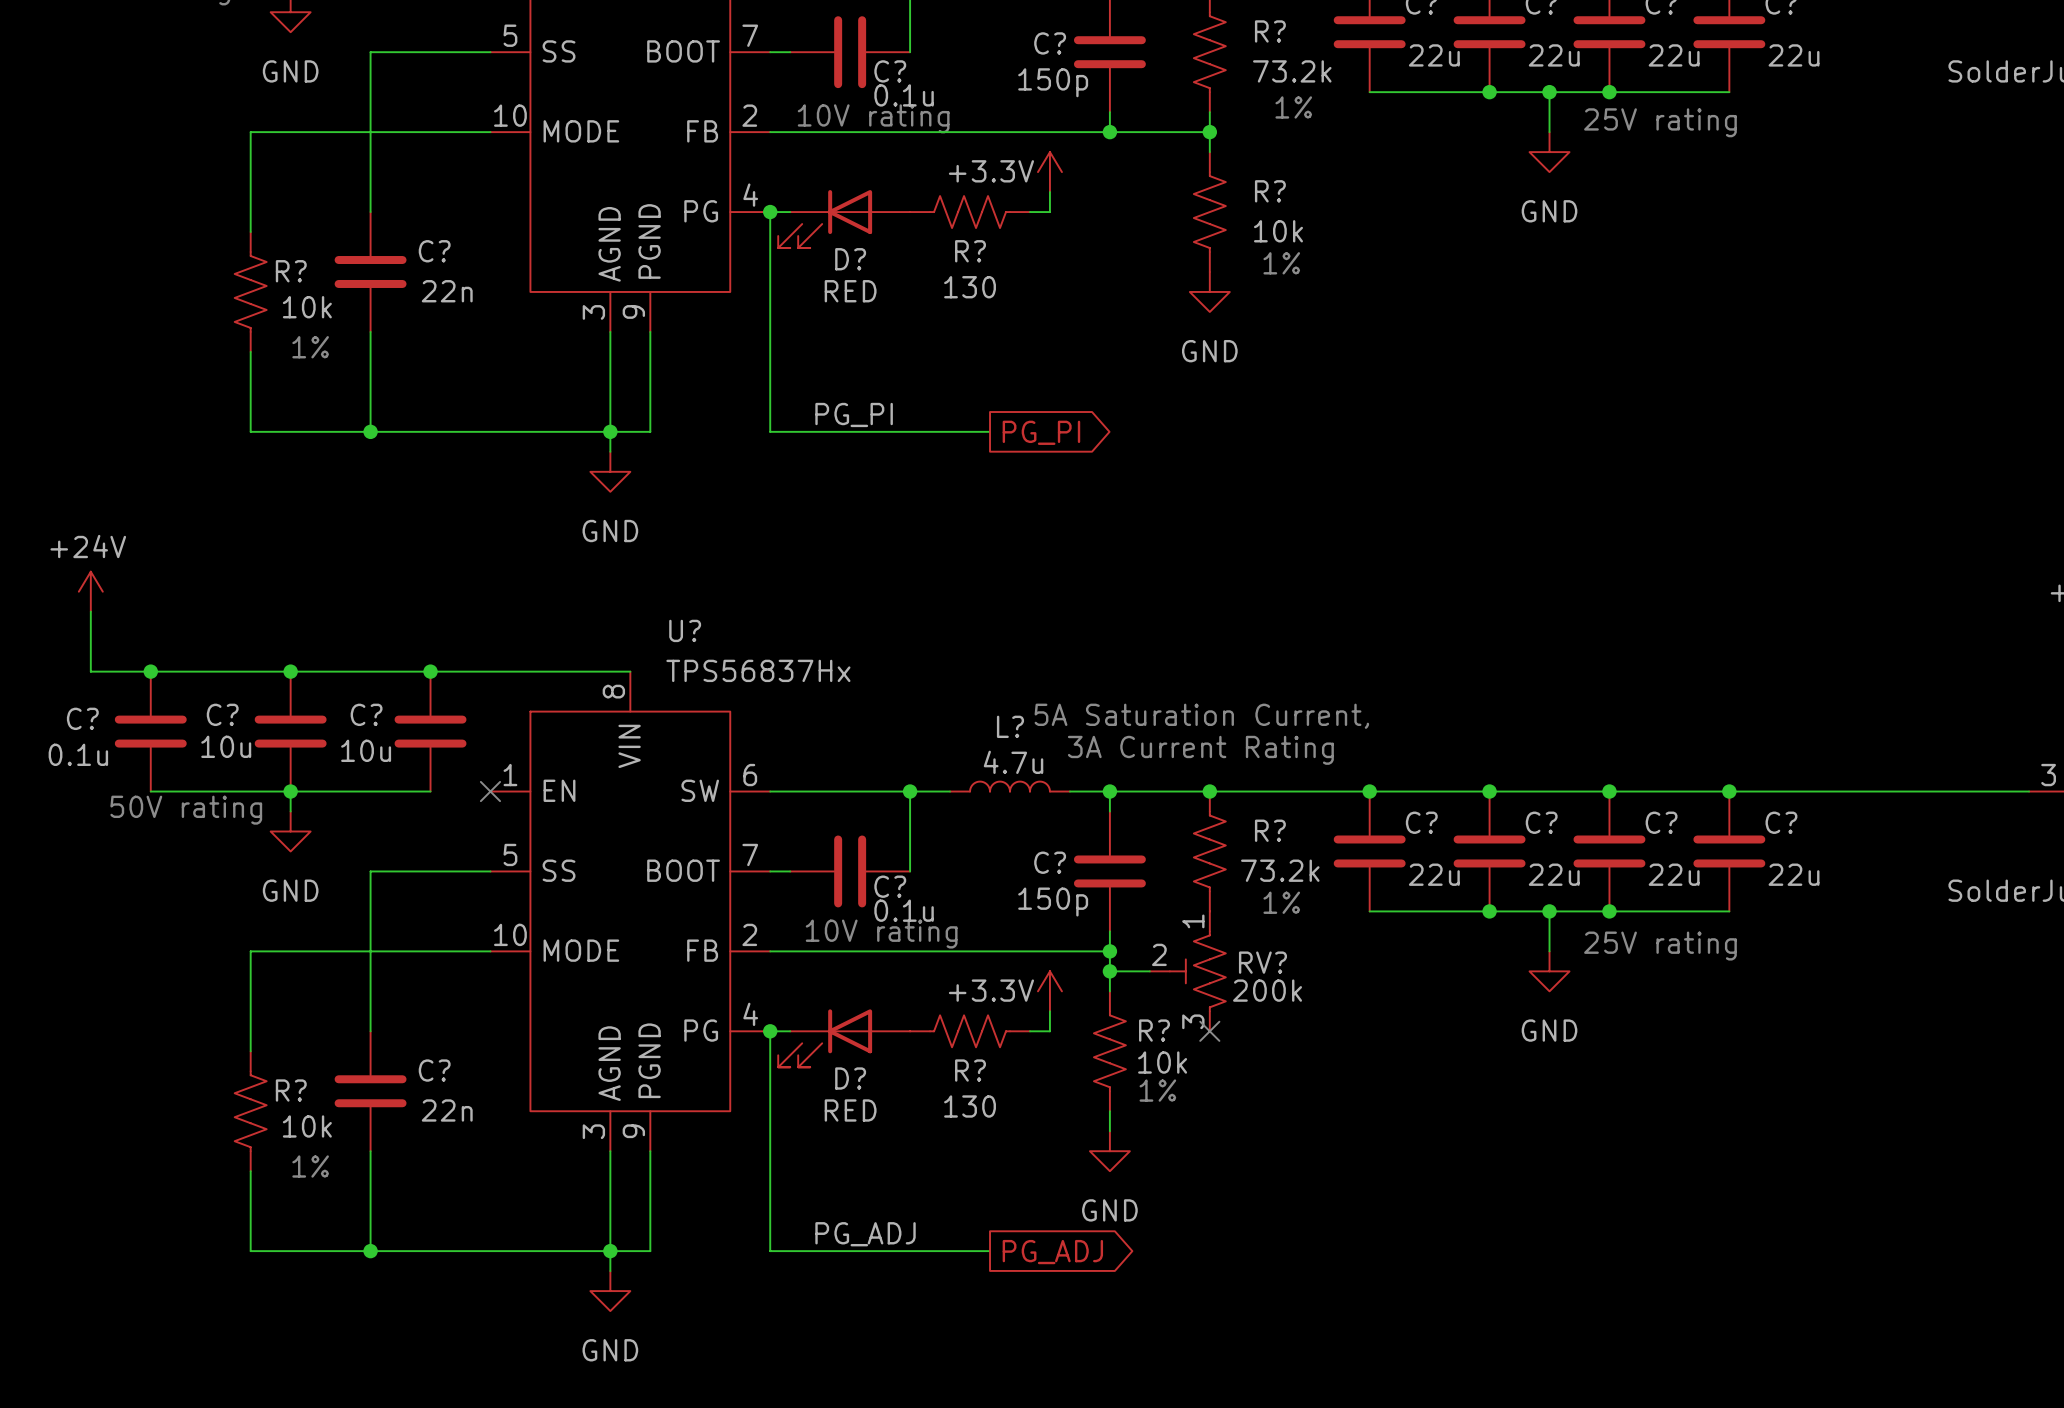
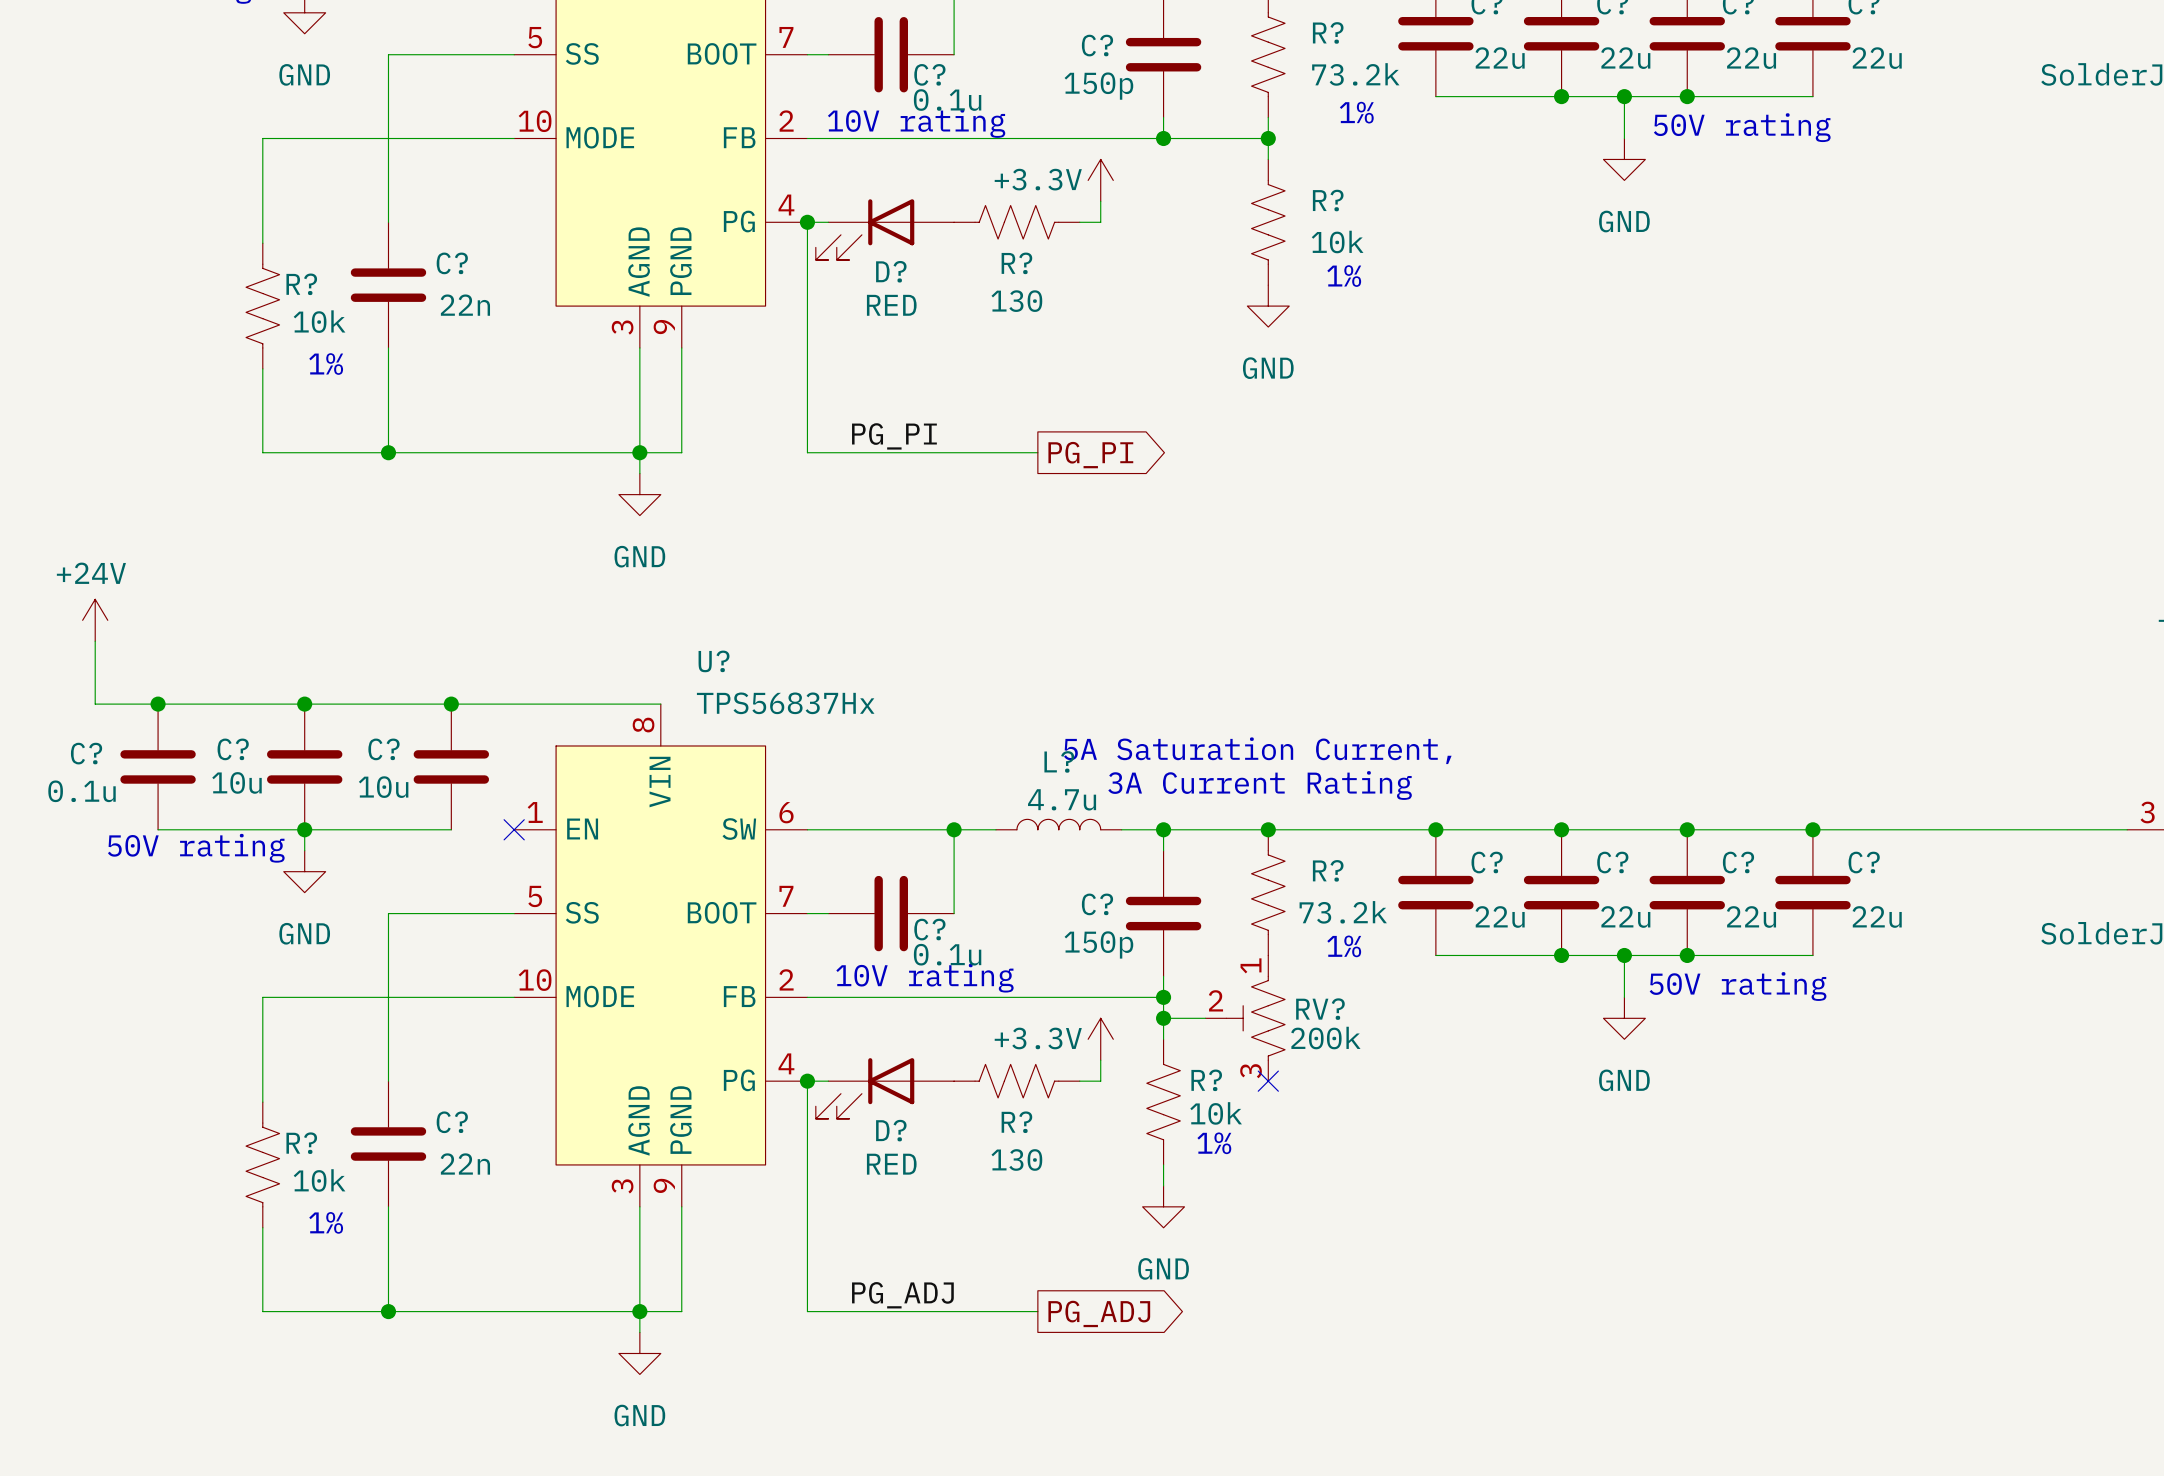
text: 25V rating (1660, 122) -> 50V rating (1742, 127)
text: 25V rating (1660, 946) -> 50V rating (1738, 986)

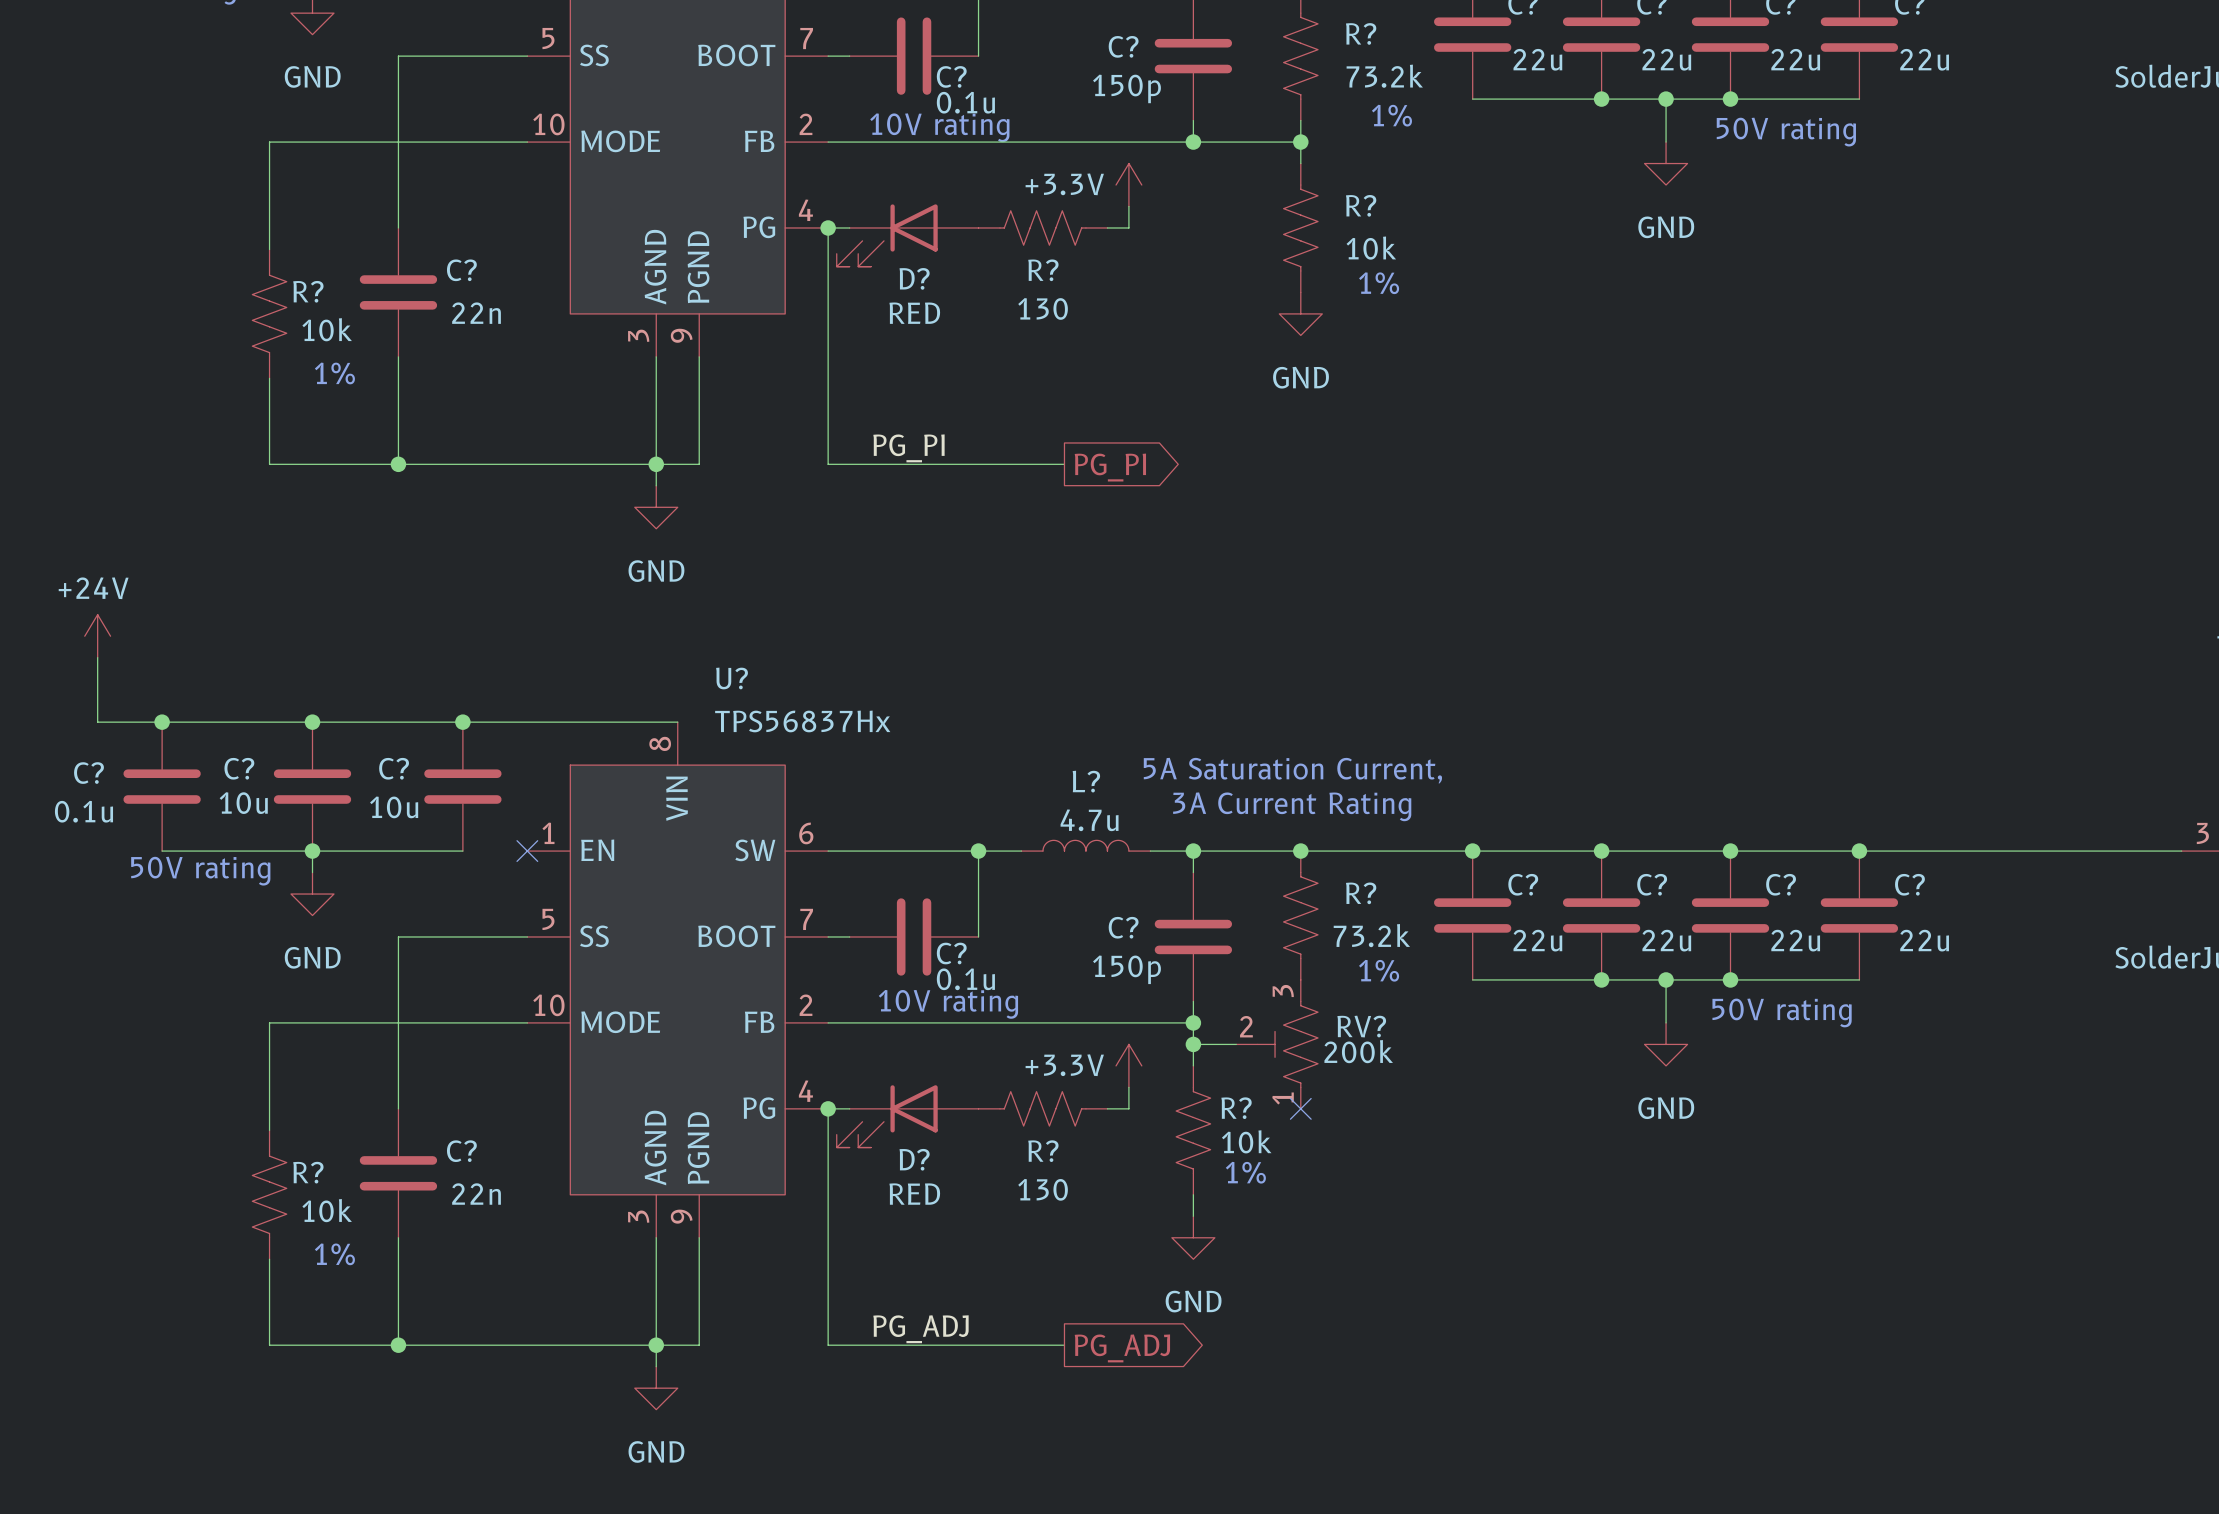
RV? flip: as is (1255, 1018) -> up-down (1287, 1044)

